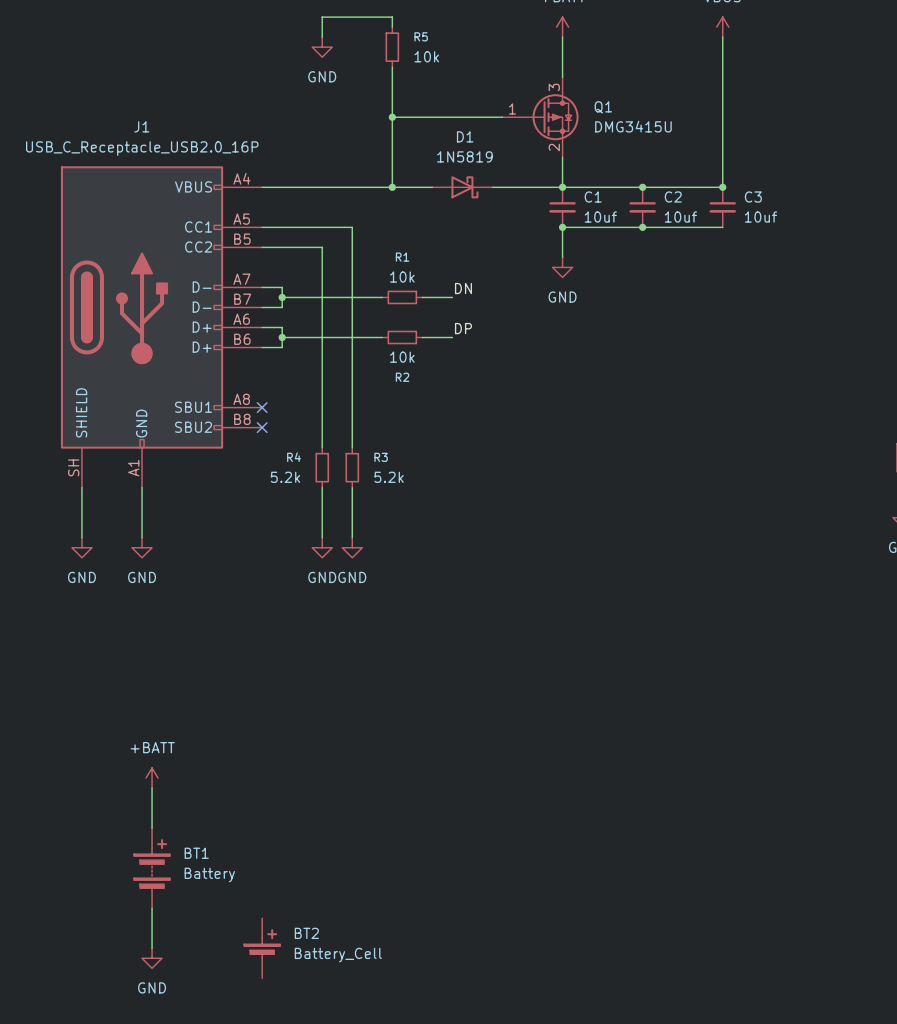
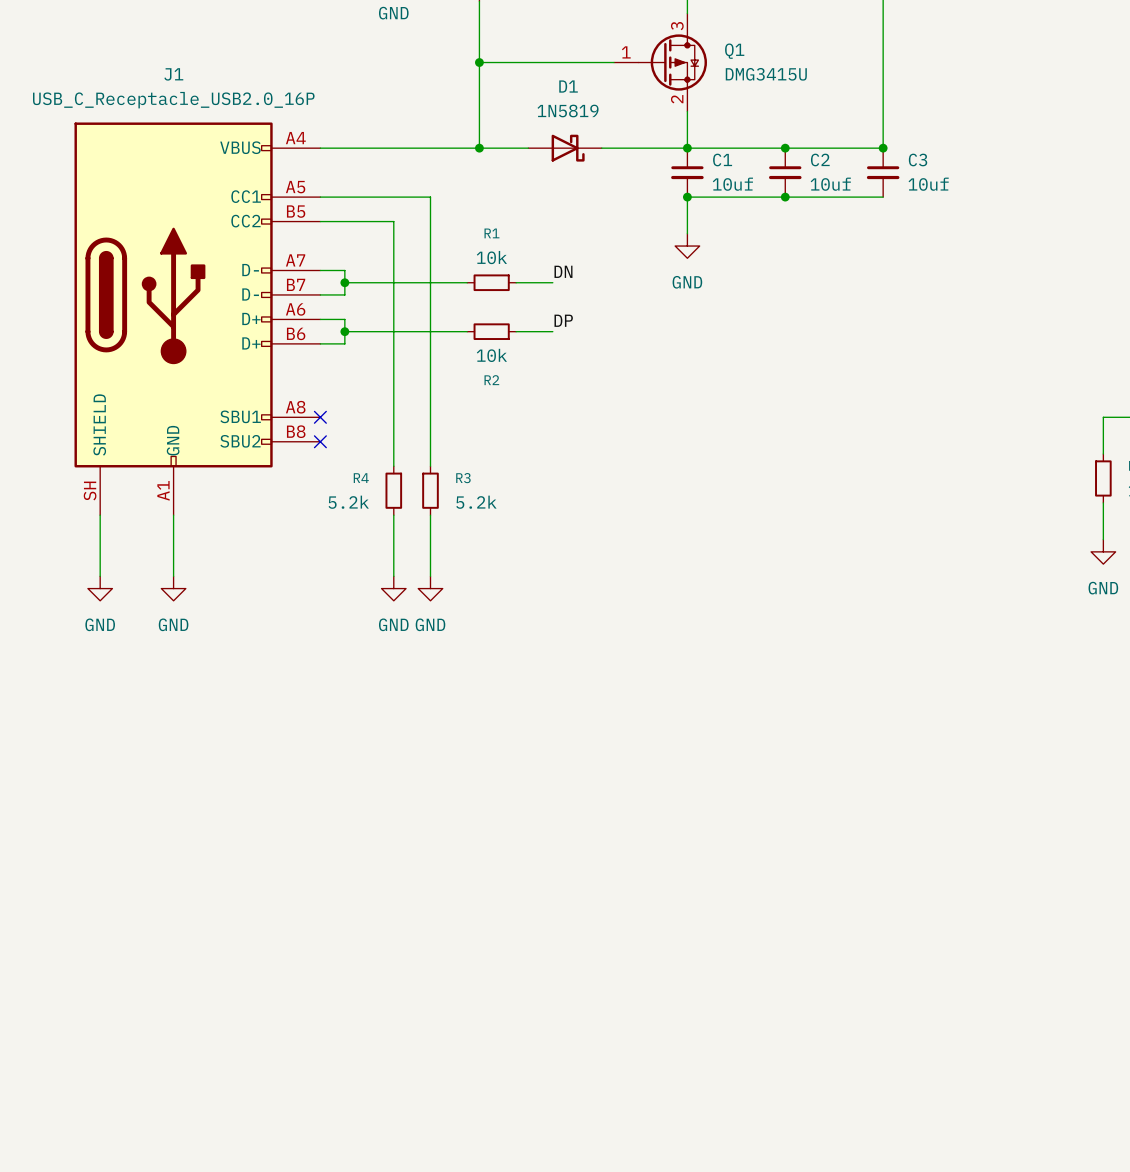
power symbol: +BATT (152, 778) -> none
wire: (152, 788) (152, 828) -> none
BT1: Battery (152, 868) -> none
wire: (152, 908) (152, 948) -> none
BT2: Battery_Cell (262, 948) -> none
power symbol: GND (152, 958) -> none

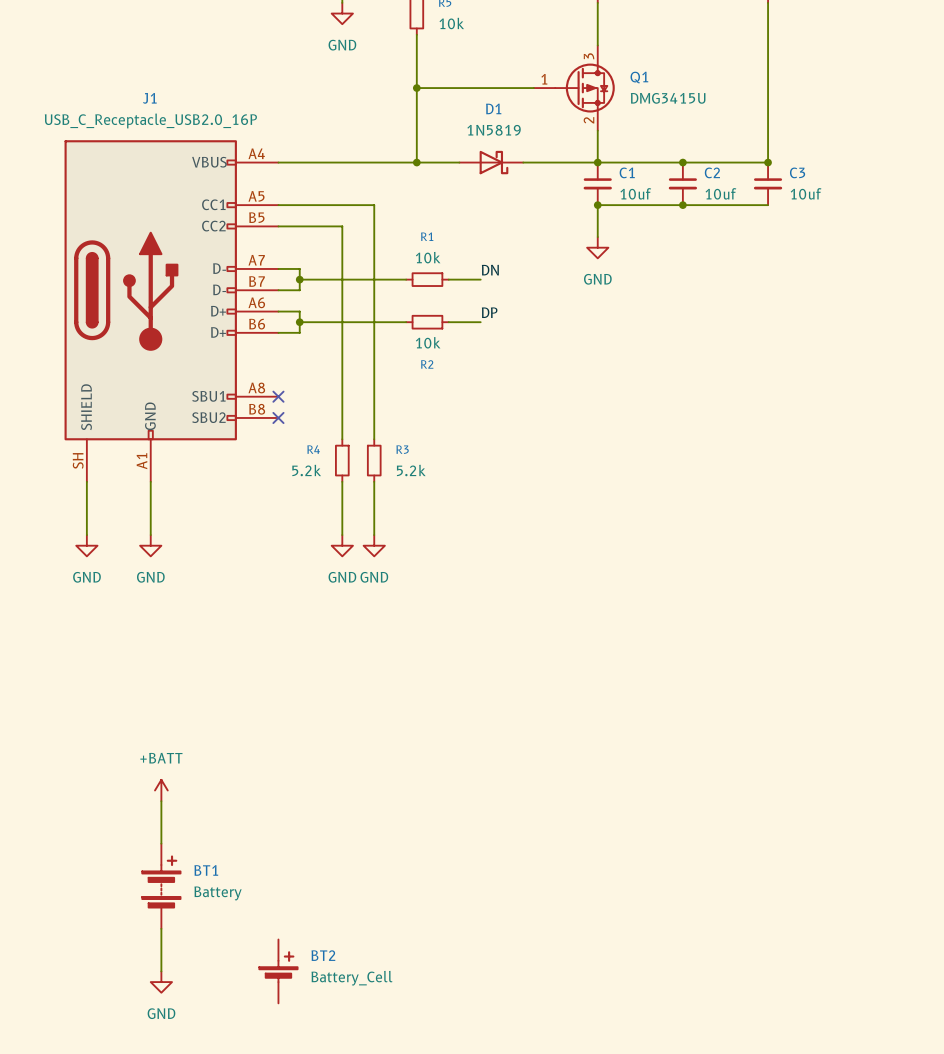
power symbol: none -> +BATT (161, 790)
wire: none -> (161, 801) (161, 843)
BT1: none -> Battery (161, 886)
wire: none -> (161, 928) (161, 971)
BT2: none -> Battery_Cell (278, 971)
power symbol: none -> GND (161, 982)

